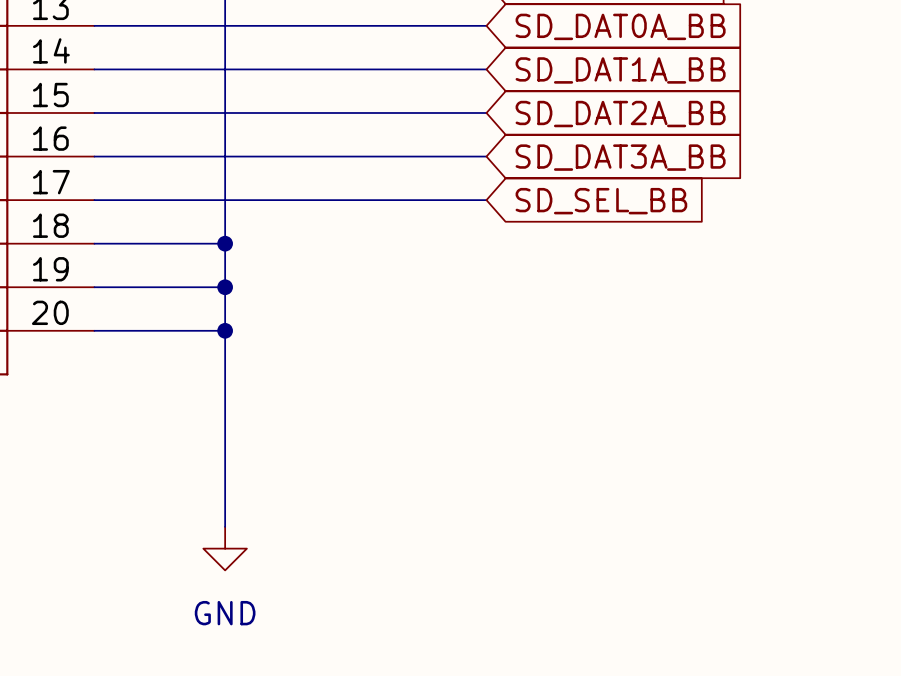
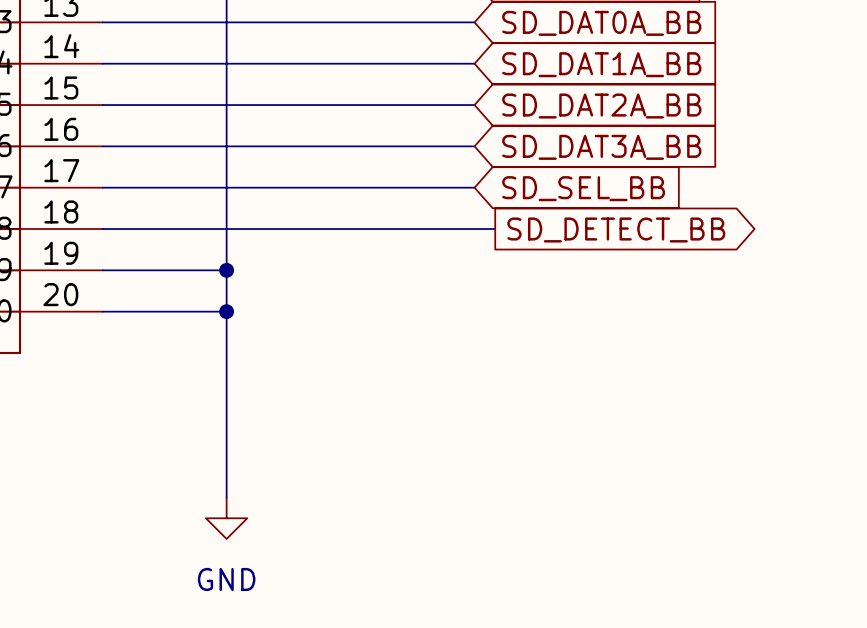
wire: none -> (226, 229) (495, 229)
junction: (225, 243) -> none
global label: none -> SD_DETECT_BB (616, 229)

